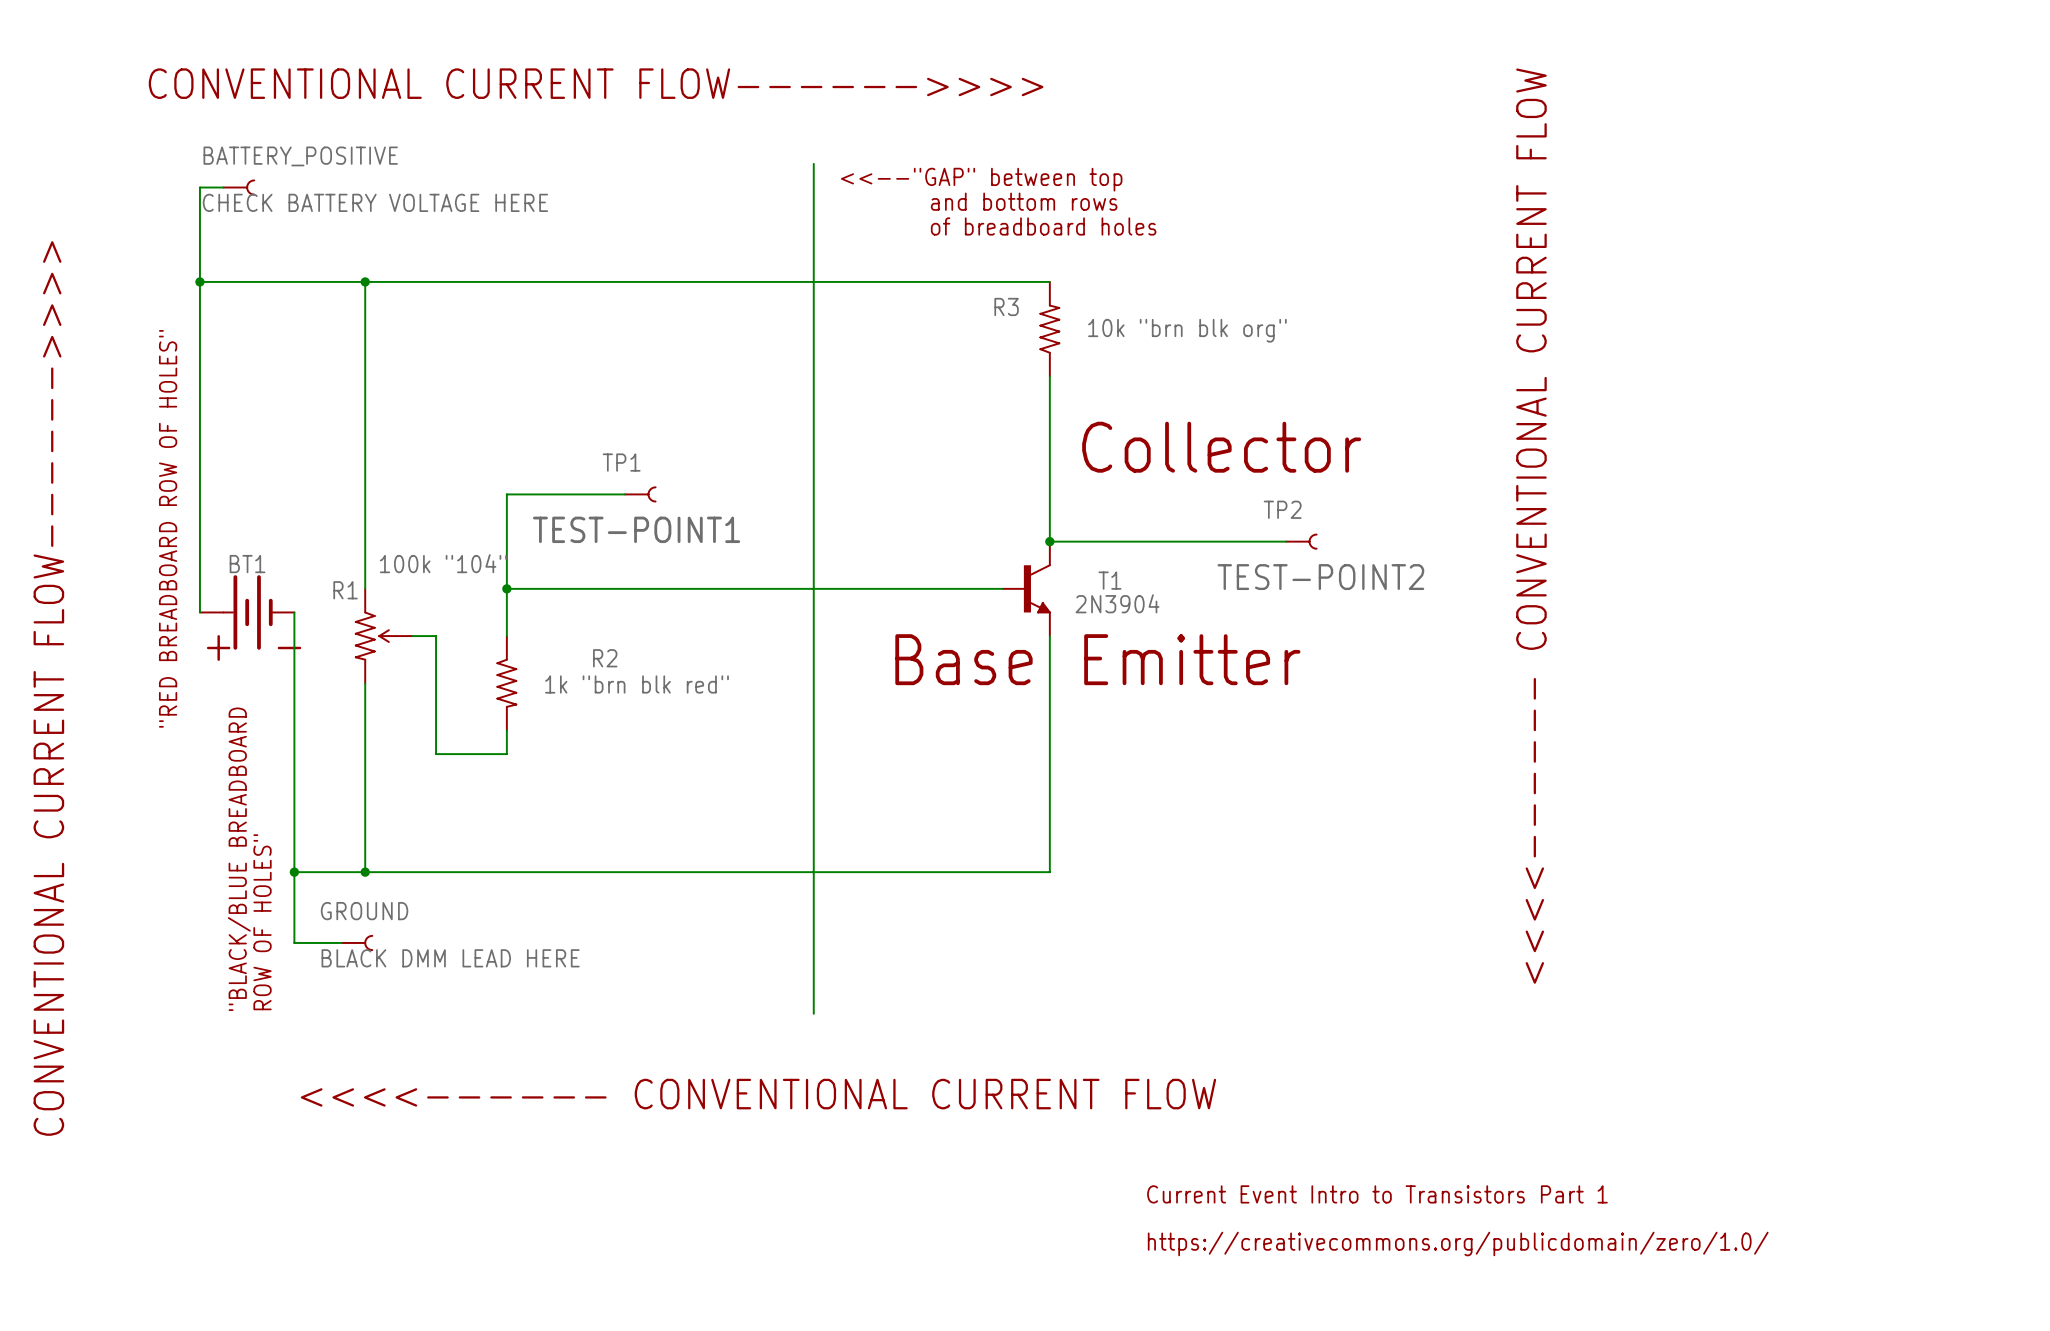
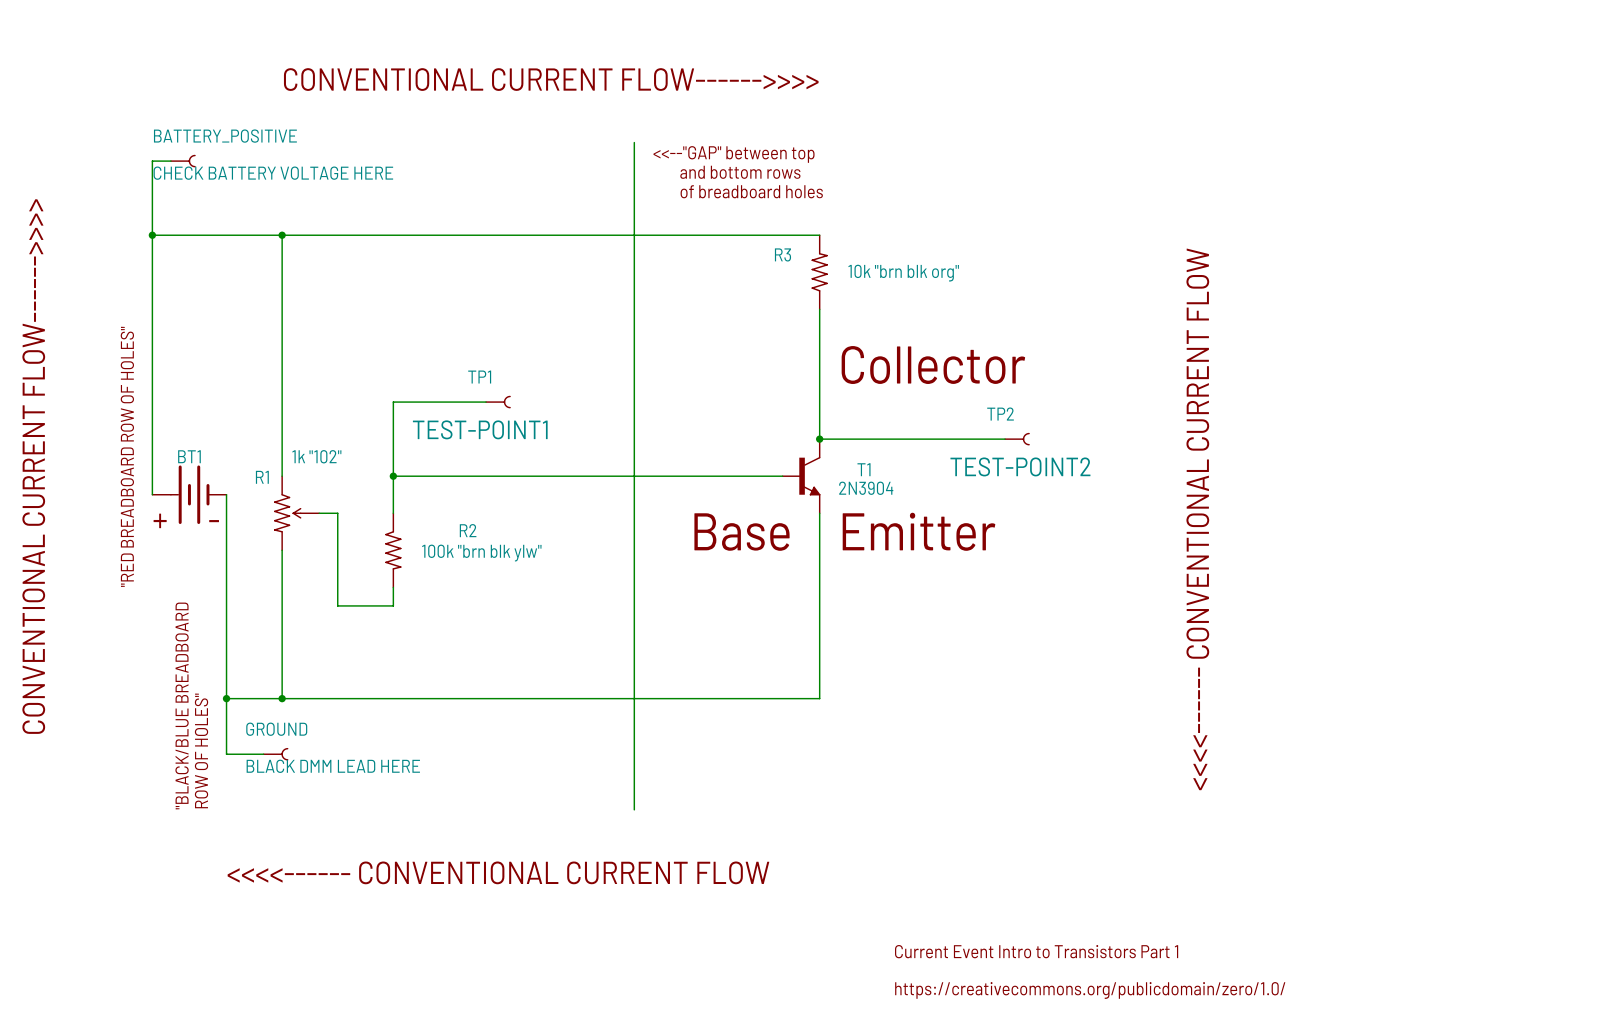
R1 value: 100k "104" (443, 563) -> 1k "102" (316, 456)
R2 value: 1k "brn blk red" (636, 684) -> 100k "brn blk ylw" (481, 553)

